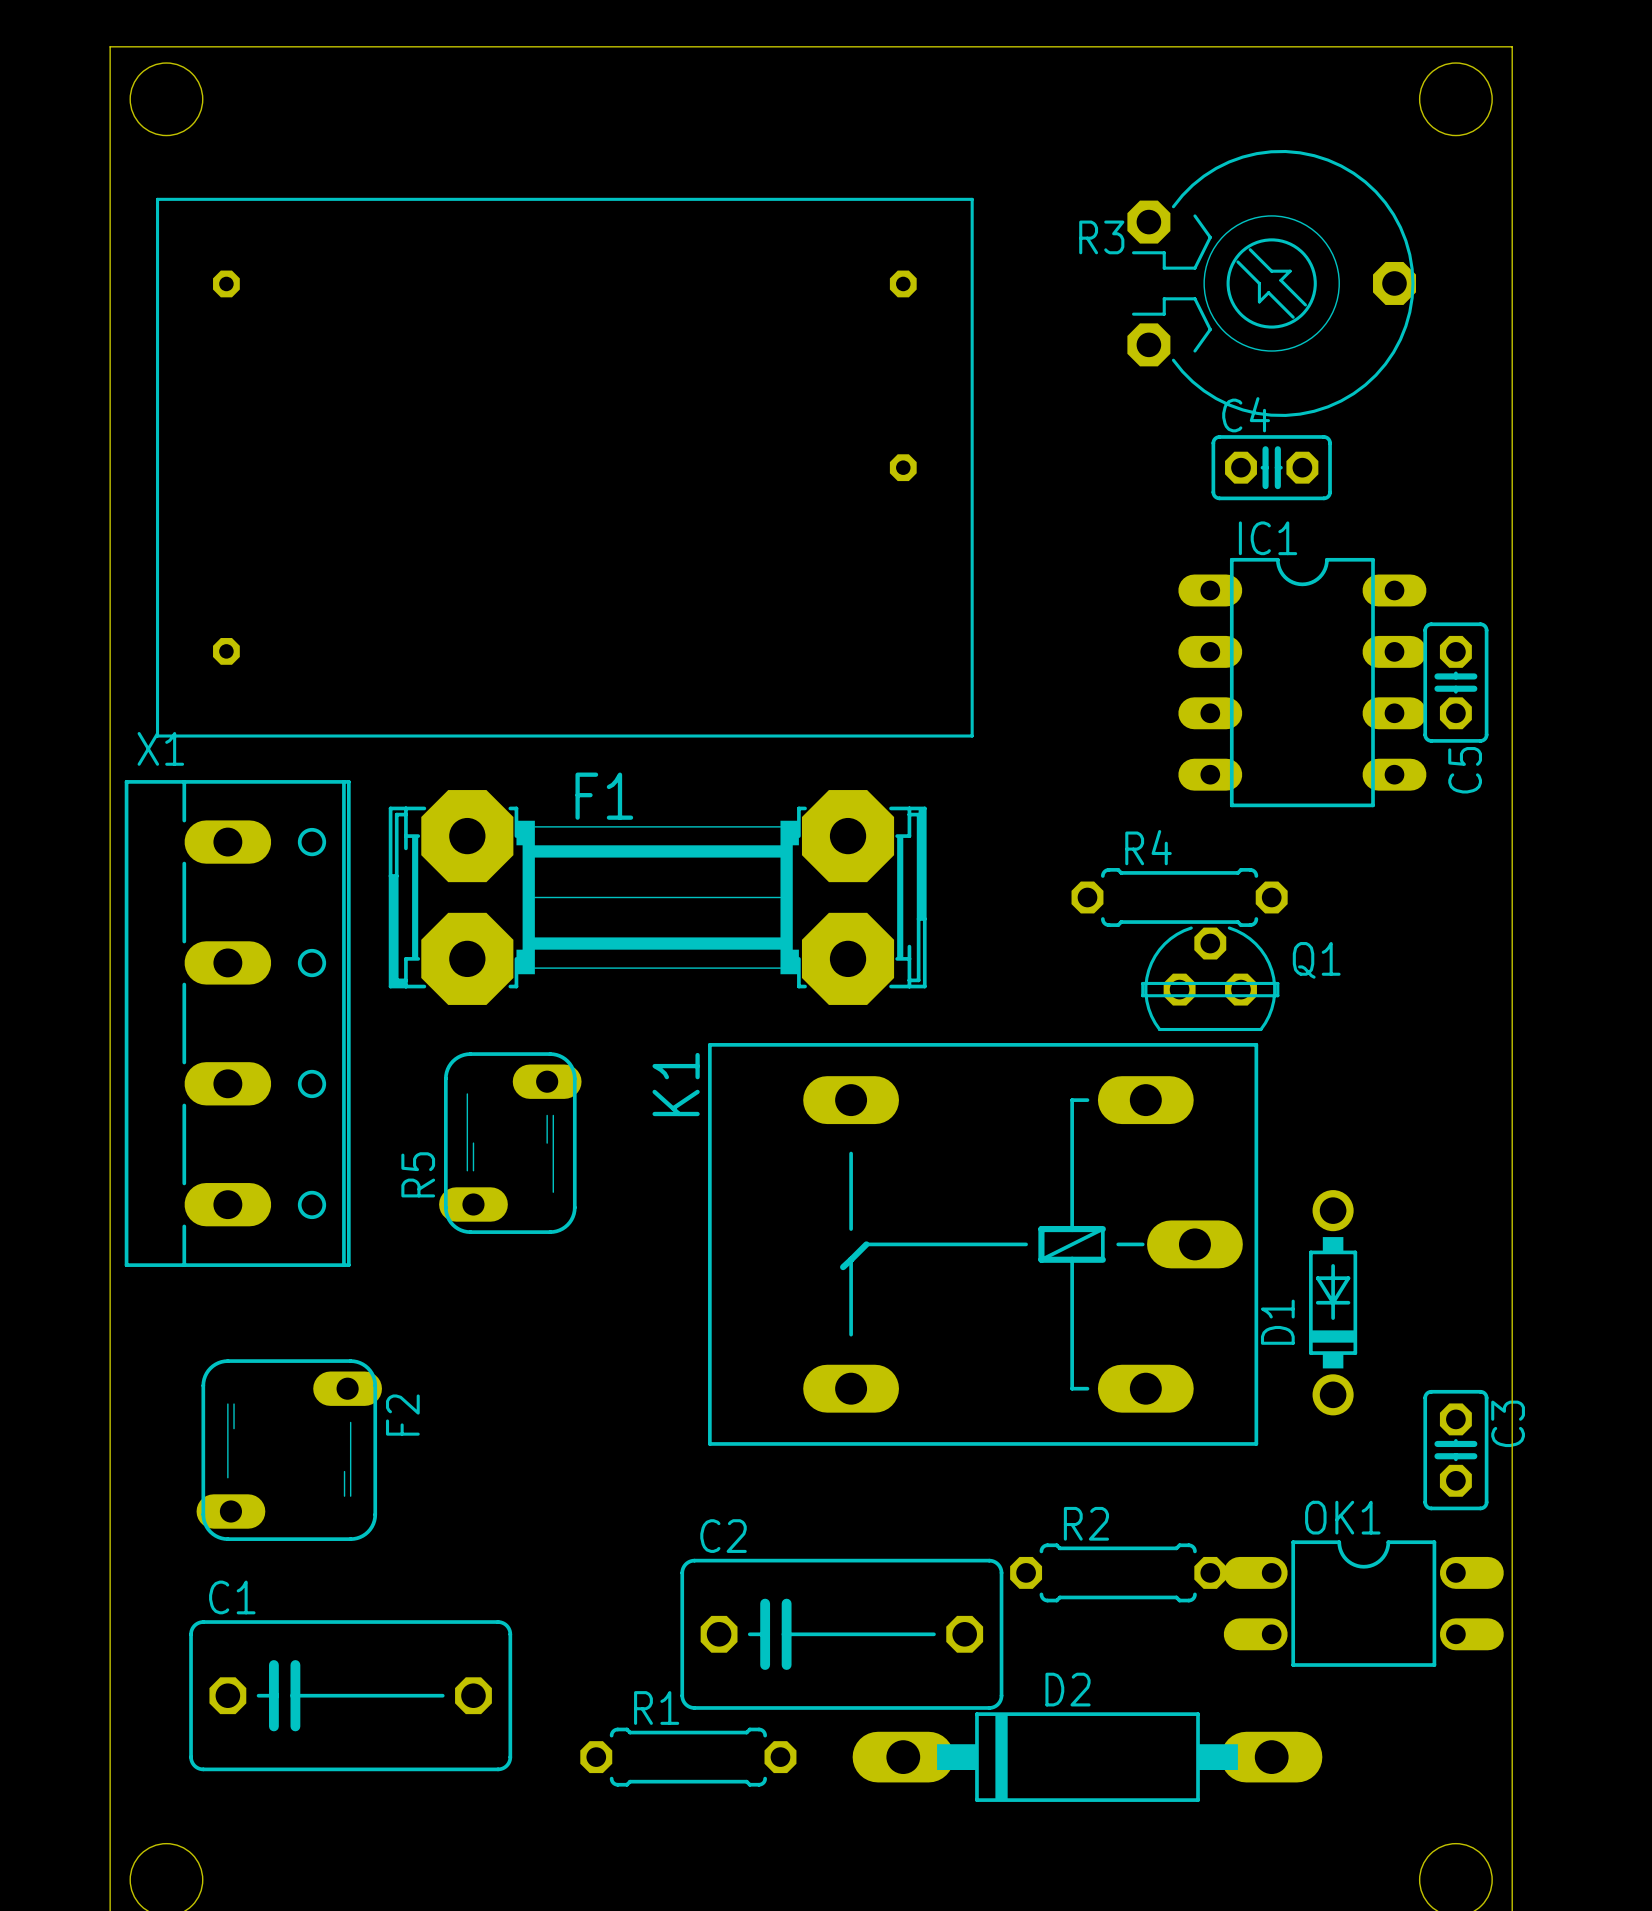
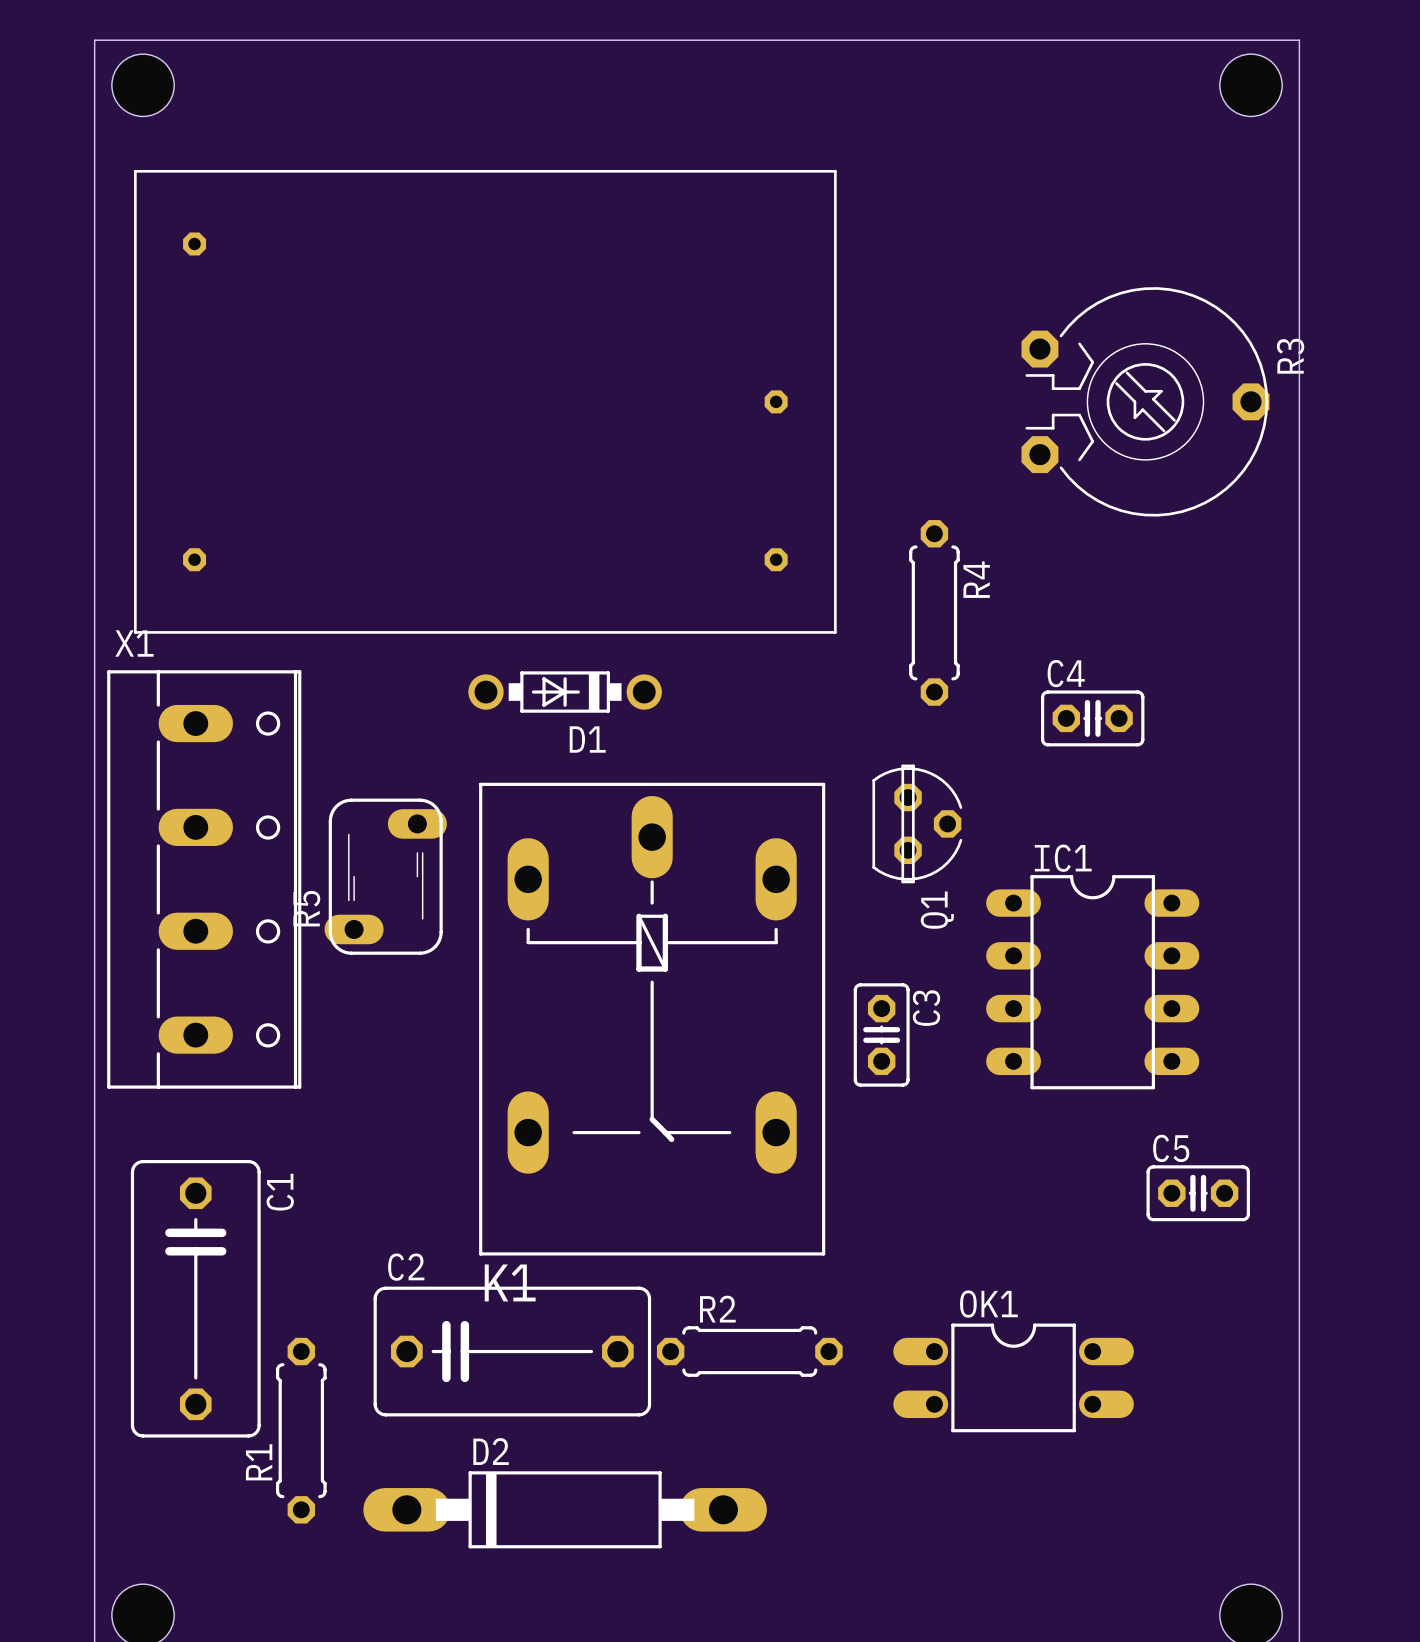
part footprint: [155, 197, 974, 738] -> [134, 169, 837, 634]
R3 name rotation: 0° (1101, 237) -> 90° counterclockwise (1290, 356)
R3 name position: R3 (1101, 237) -> R3 (1290, 356)
R3 position: (1271, 283) -> (1145, 401)
C4 position: (1271, 467) -> (1092, 718)
IC1 position: (1302, 682) -> (1092, 982)
C5 rotation: 0° (1455, 682) -> 90° clockwise (1198, 1193)
C5 position: (1455, 682) -> (1198, 1193)
C5 name position: C5 (1465, 770) -> C5 (1171, 1148)
F1: (657, 897) -> none
R4 rotation: 0° (1179, 897) -> 90° clockwise (934, 612)
R4 position: (1179, 897) -> (934, 612)
Q1 rotation: 0° (1210, 978) -> 90° clockwise (917, 823)
Q1 position: (1210, 978) -> (917, 823)
R5 position: (510, 1143) -> (385, 876)
K1 rotation: 0° (983, 1244) -> 90° counterclockwise (652, 1019)
D1 rotation: 0° (1333, 1302) -> 90° counterclockwise (565, 692)
D1 position: (1333, 1302) -> (565, 692)
F2: (289, 1450) -> none
C3 position: (1455, 1450) -> (881, 1034)
R2 position: (1118, 1572) -> (749, 1351)
OK1 position: (1363, 1603) -> (1013, 1377)
C2 position: (841, 1634) -> (512, 1351)
D2 name position: D2 (1068, 1689) -> D2 (491, 1451)
C1 rotation: 0° (350, 1695) -> 90° clockwise (195, 1298)
C1 position: (350, 1695) -> (195, 1298)
R1 name position: R1 (656, 1707) -> R1 (259, 1462)
R1 rotation: 0° (688, 1757) -> 90° clockwise (301, 1430)
R1 position: (688, 1757) -> (301, 1430)
D2 position: (1087, 1757) -> (565, 1509)

